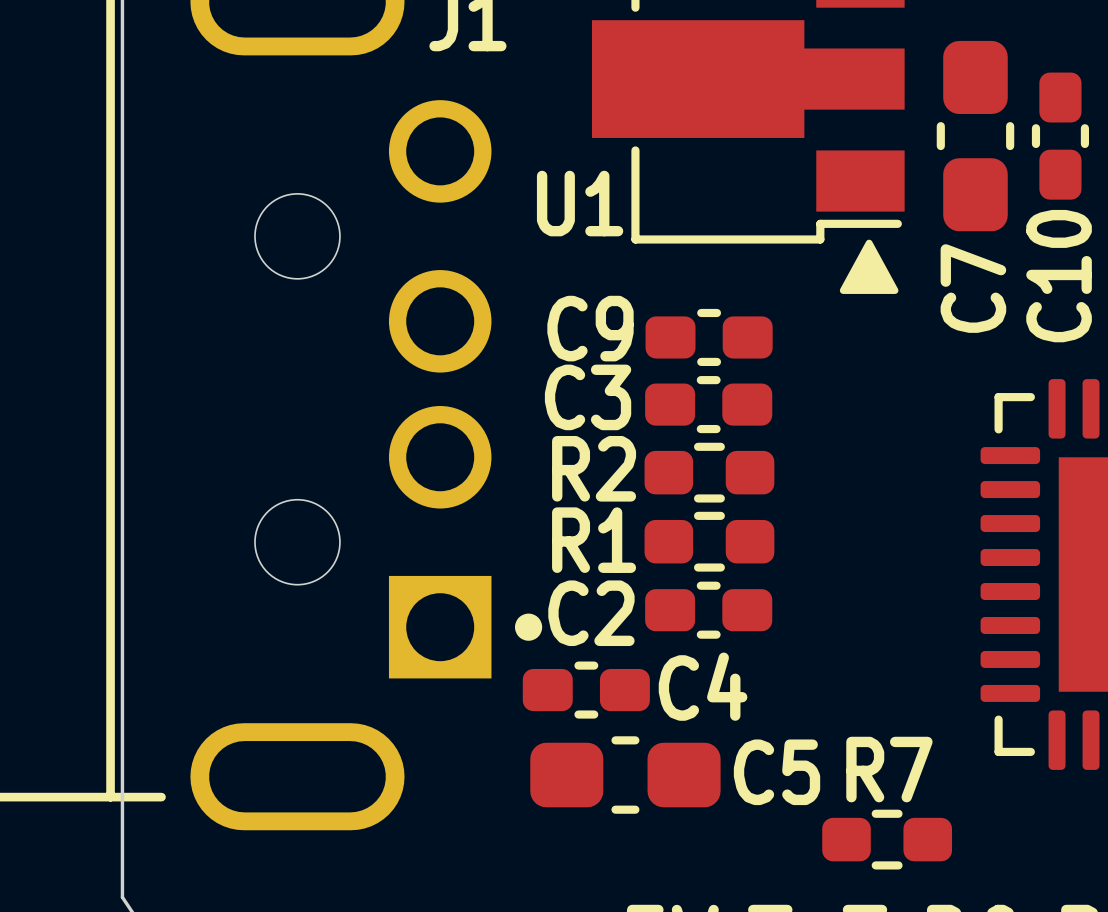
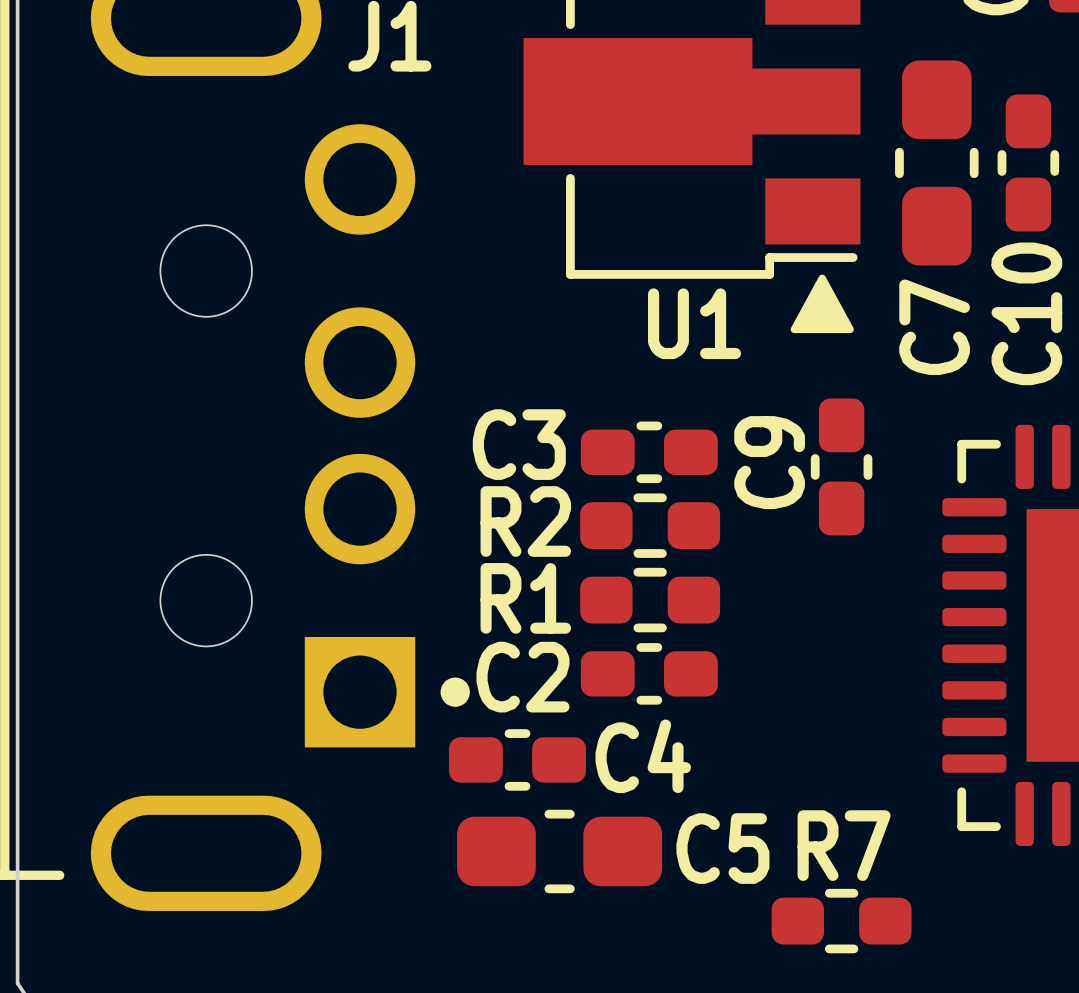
U1 name position: U1 (580, 203) -> U1 (694, 323)
C9 rotation: 0° (709, 337) -> 90° clockwise (841, 466)
C9 position: (709, 337) -> (841, 466)

